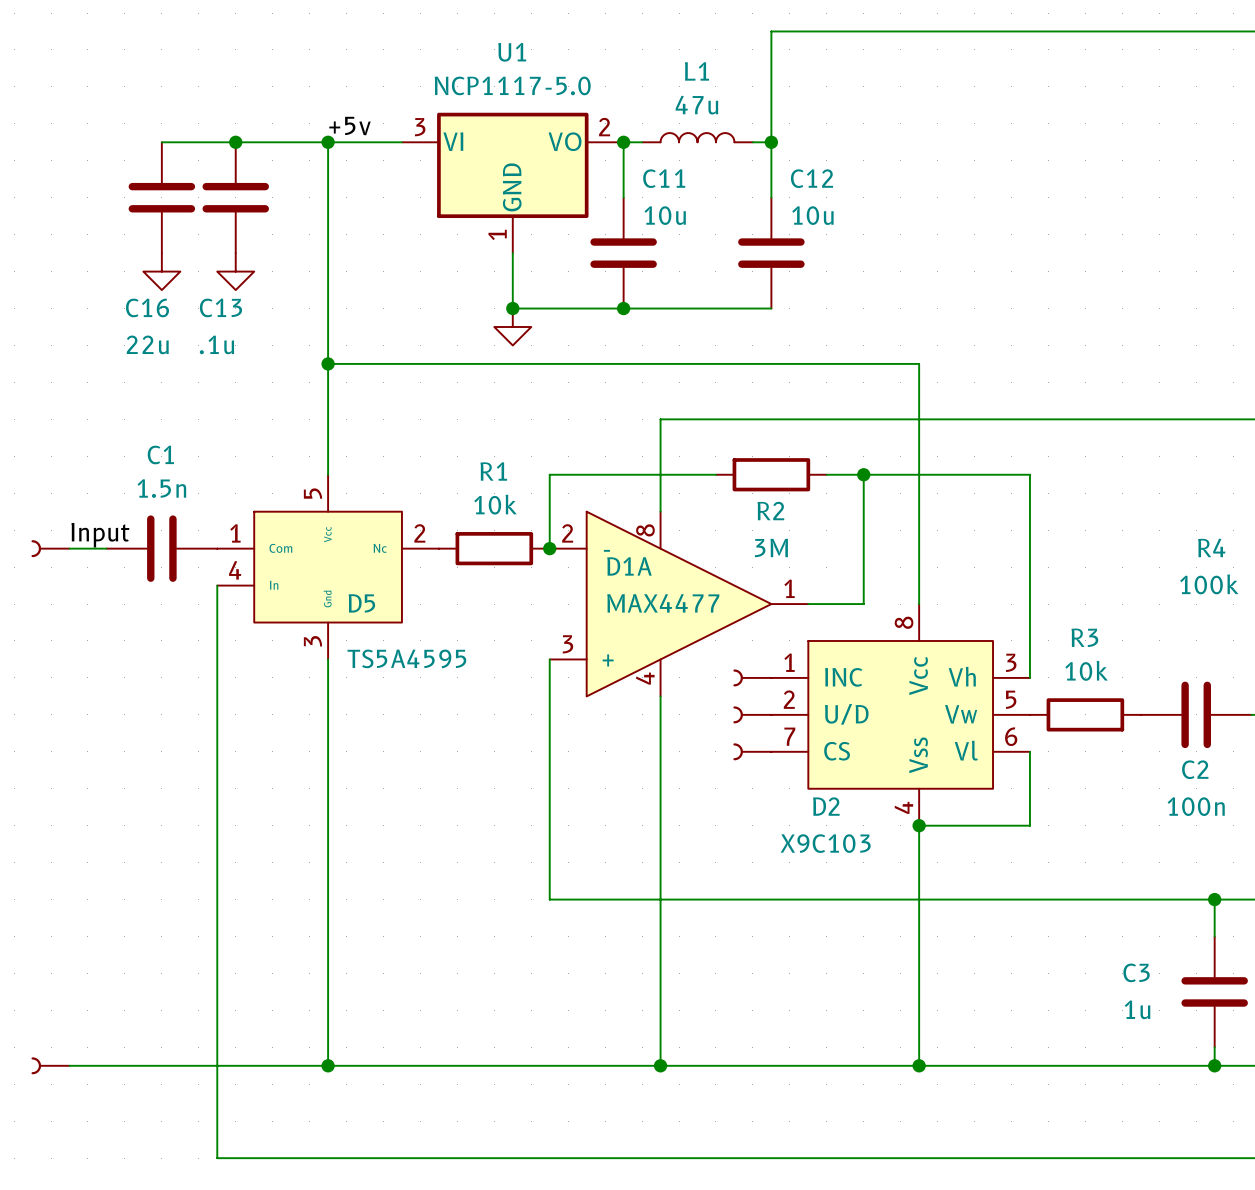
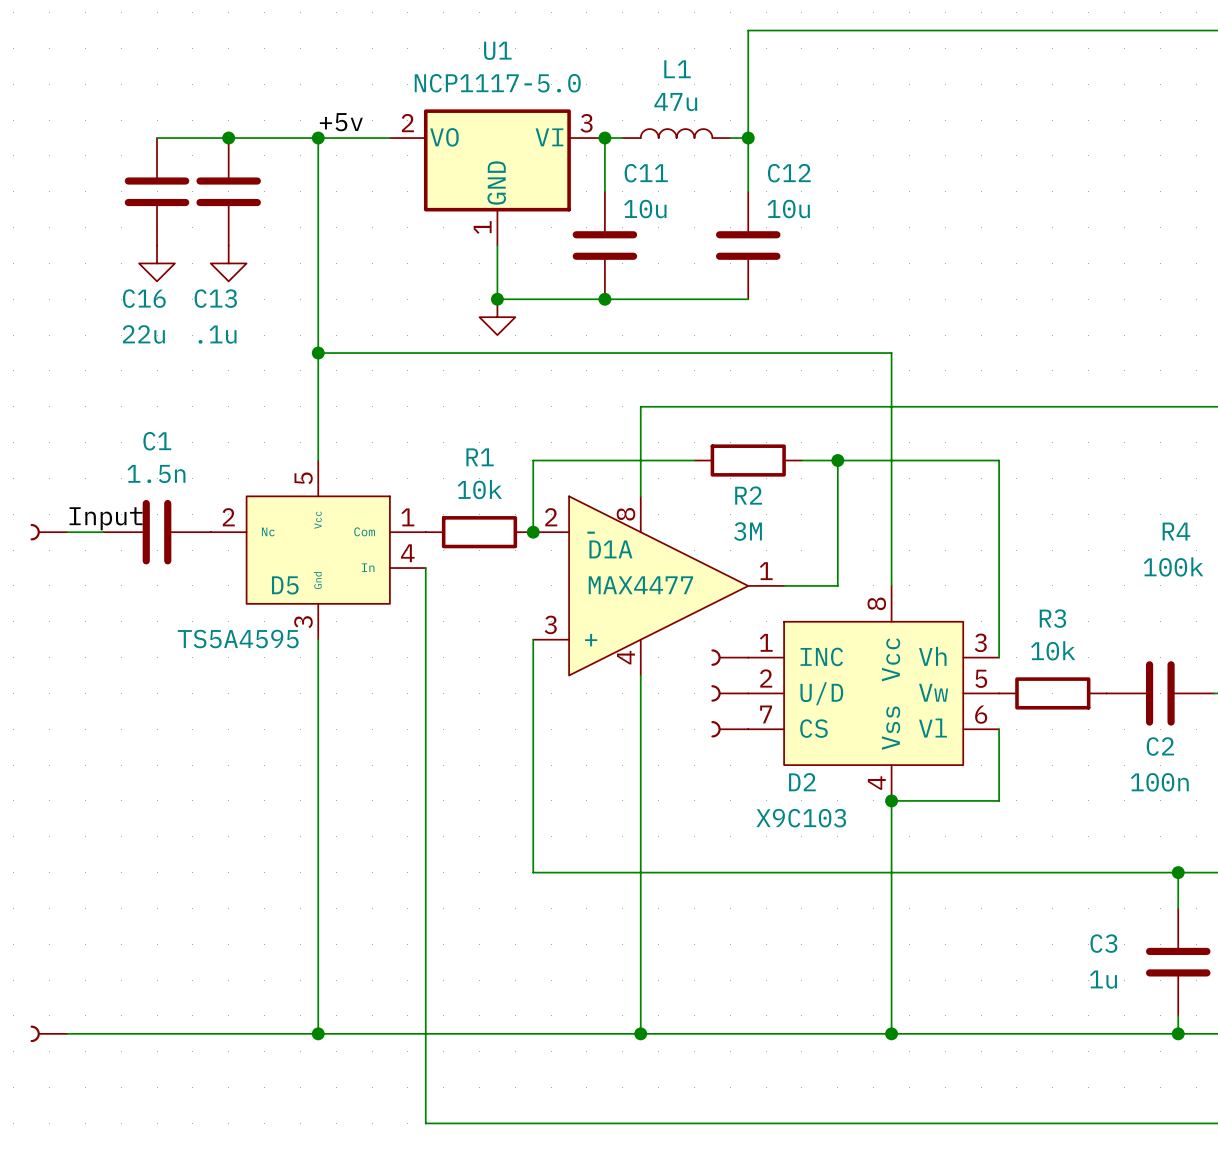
U1 flip: as is (512, 165) -> left-right (497, 160)
D5 flip: as is (328, 567) -> left-right (318, 550)
wire: (217, 585) (217, 1158) (438, 1158) -> (425, 568) (425, 1123)

